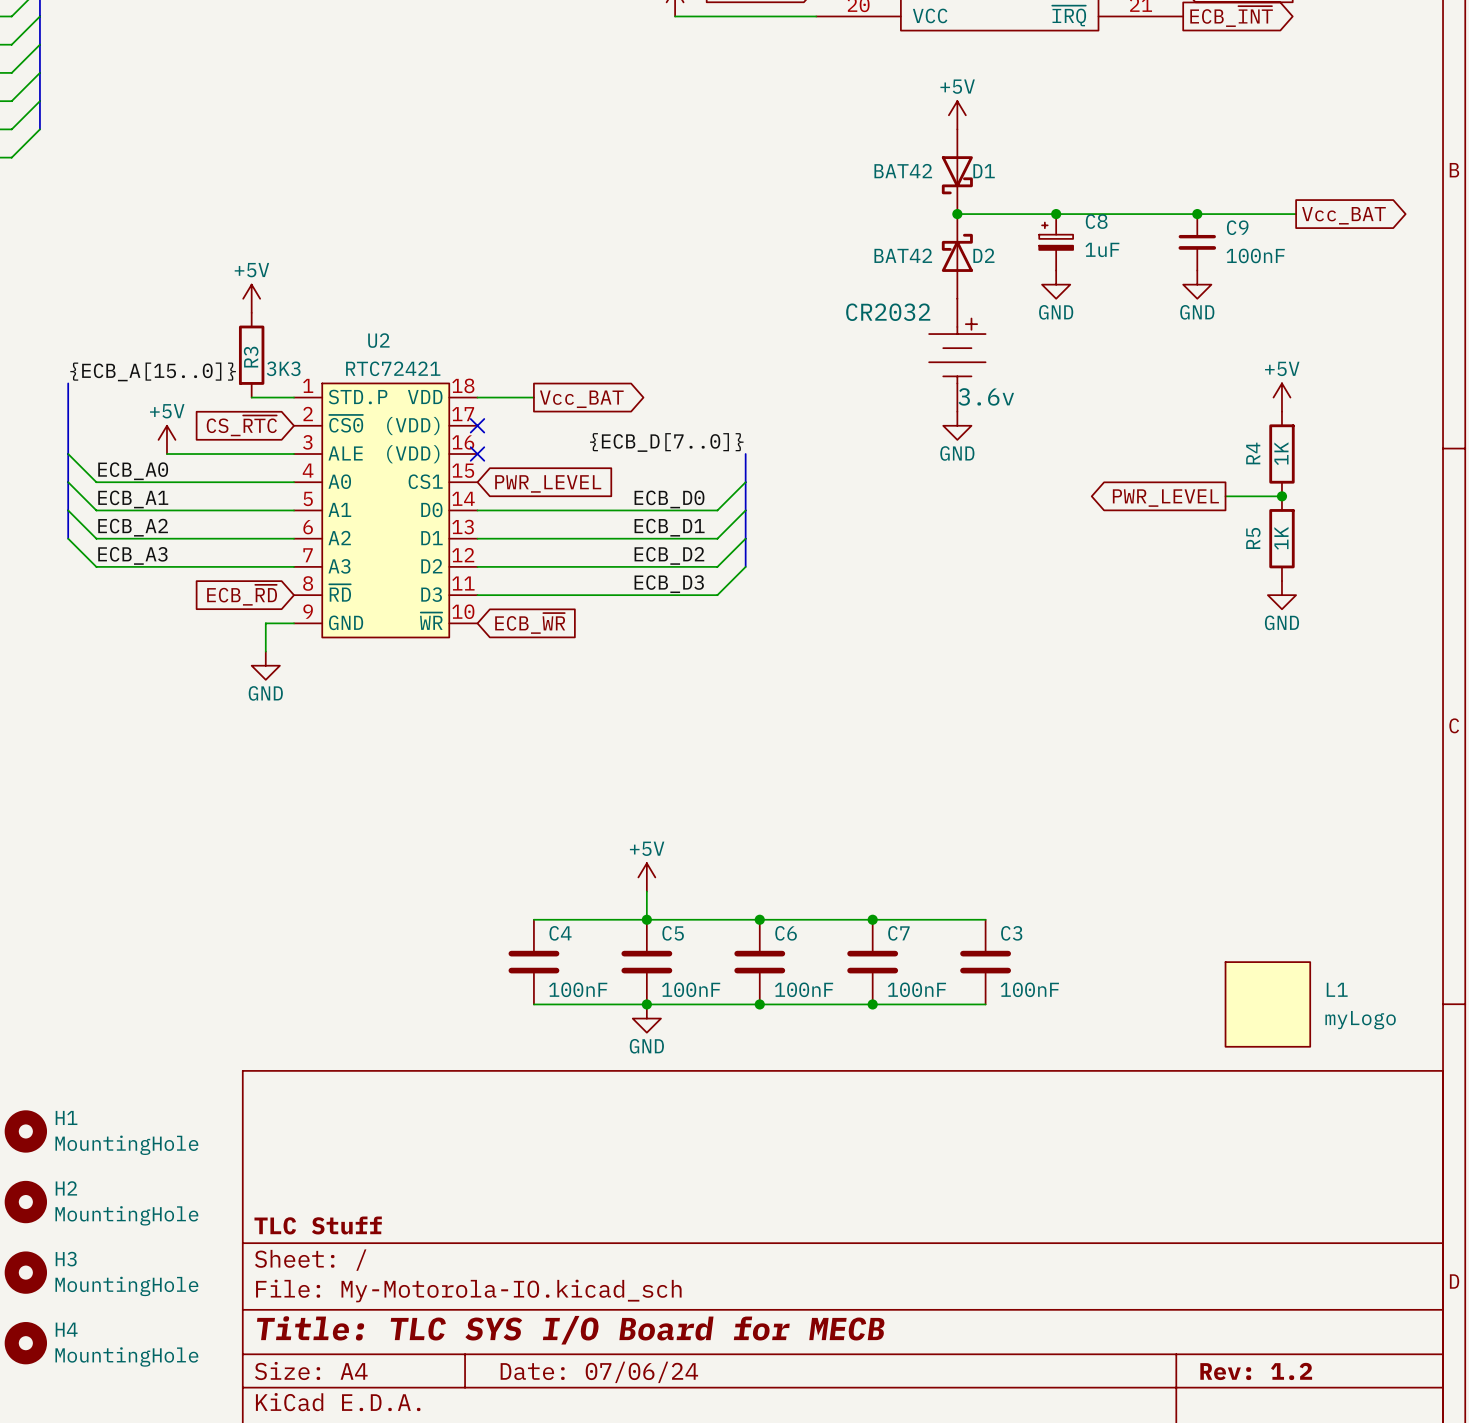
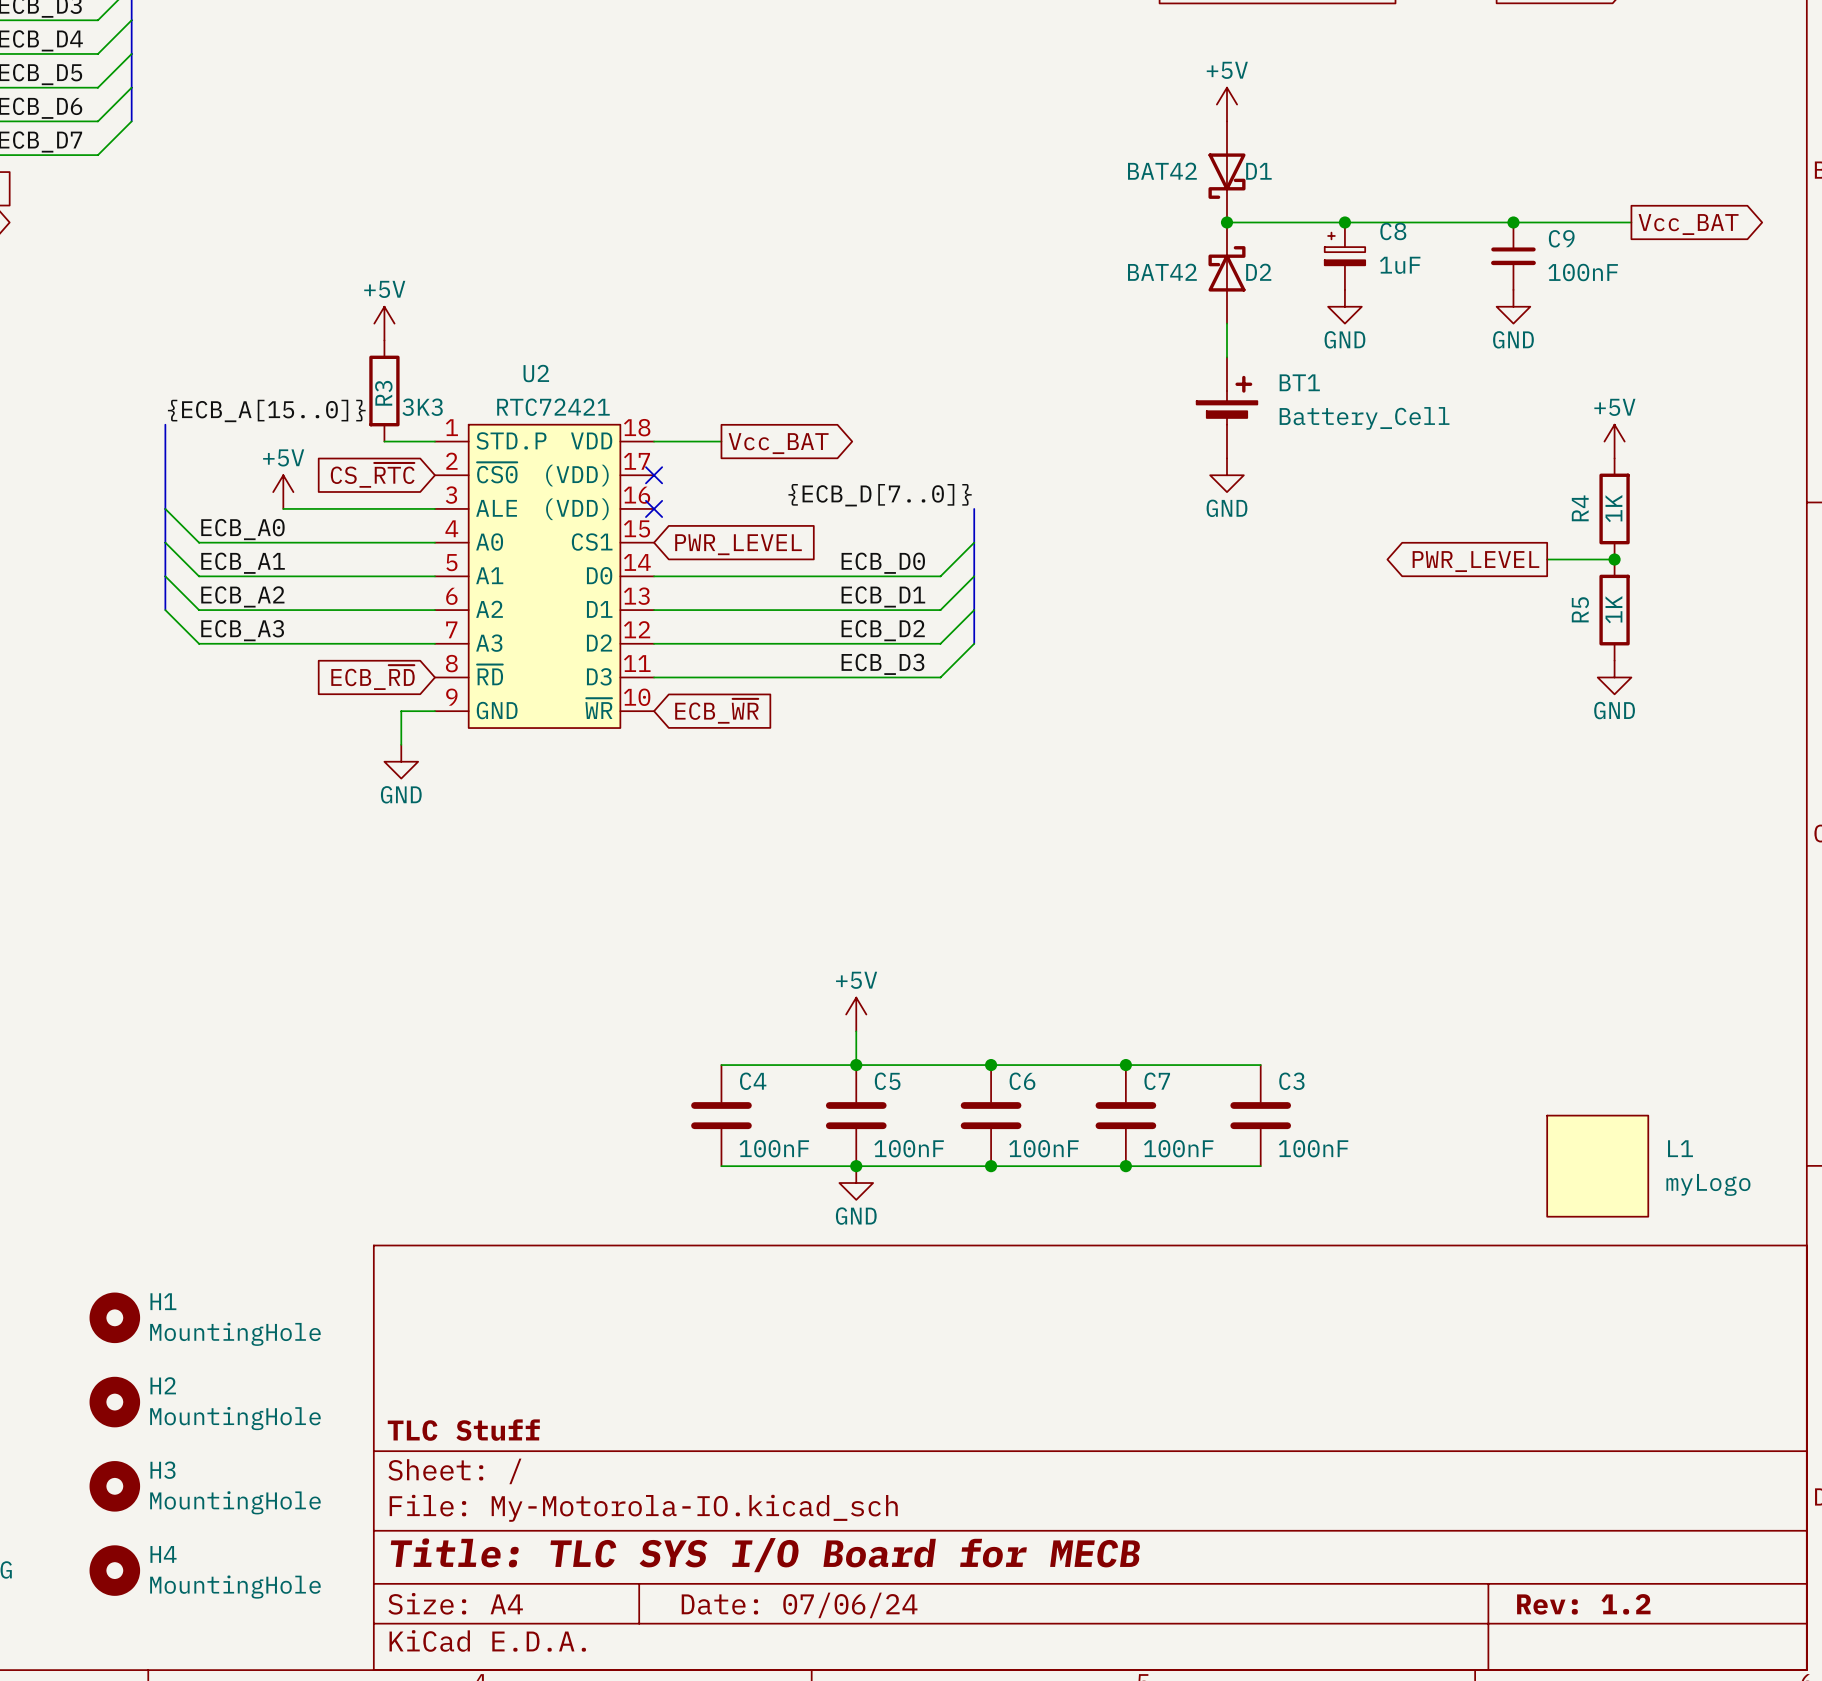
CR2032: 3.6v (957, 355) -> none
BT1: none -> Battery_Cell (1226, 407)

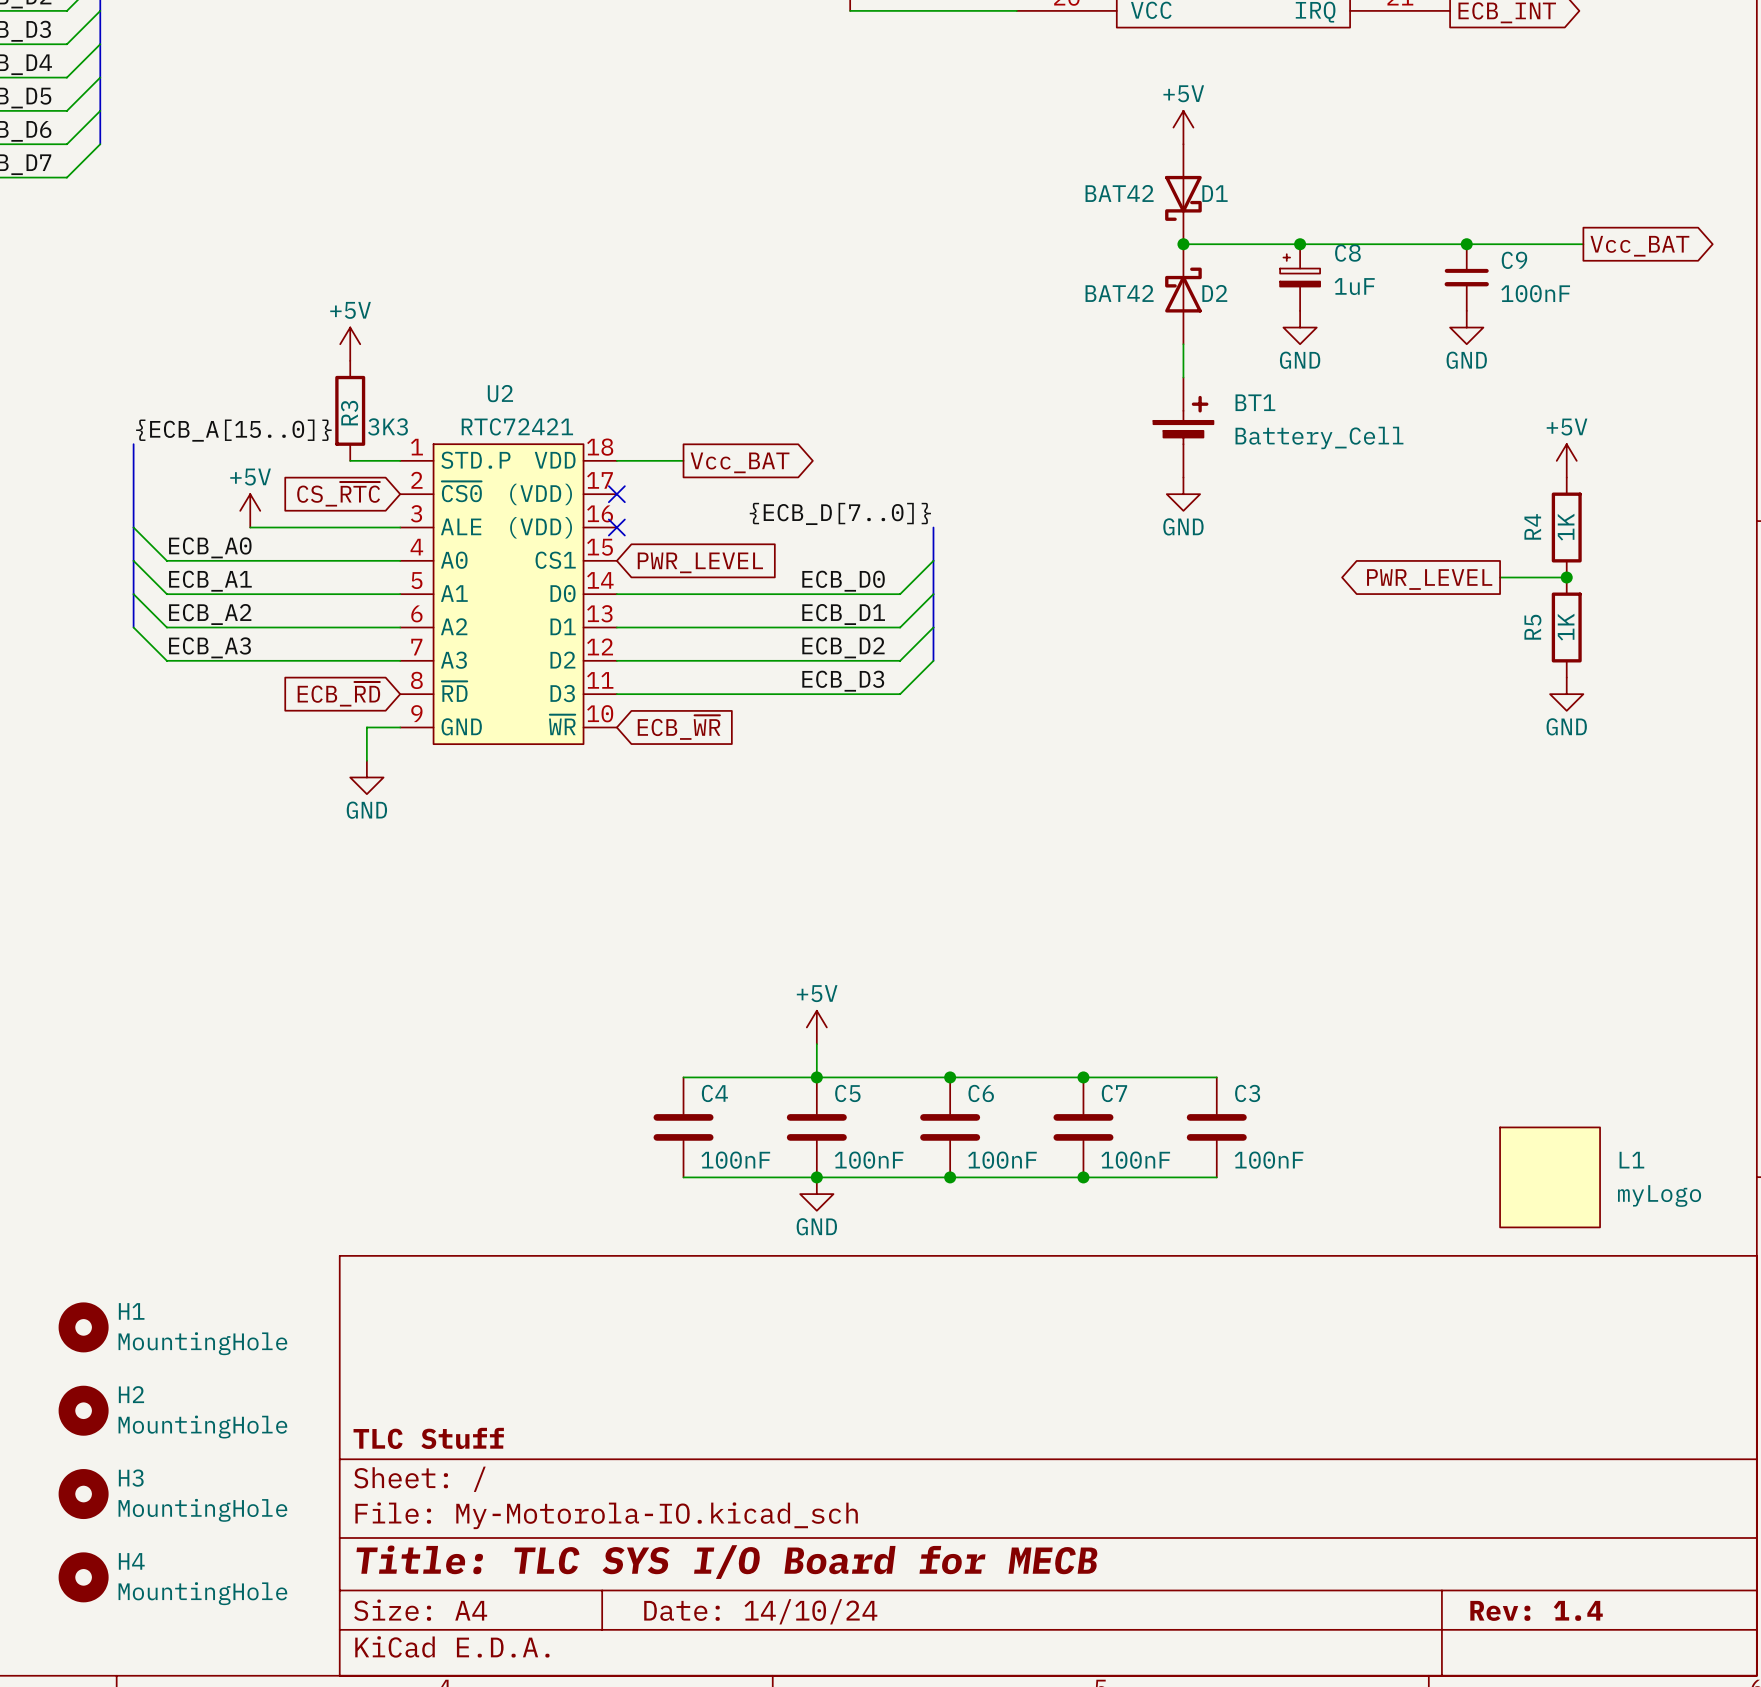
title block: Rev: 1.2 (1583, 1604) -> Rev: 1.4 (1536, 1610)
title block: Date: 07/06/24 (799, 1605) -> Date: 14/10/24 (760, 1611)

